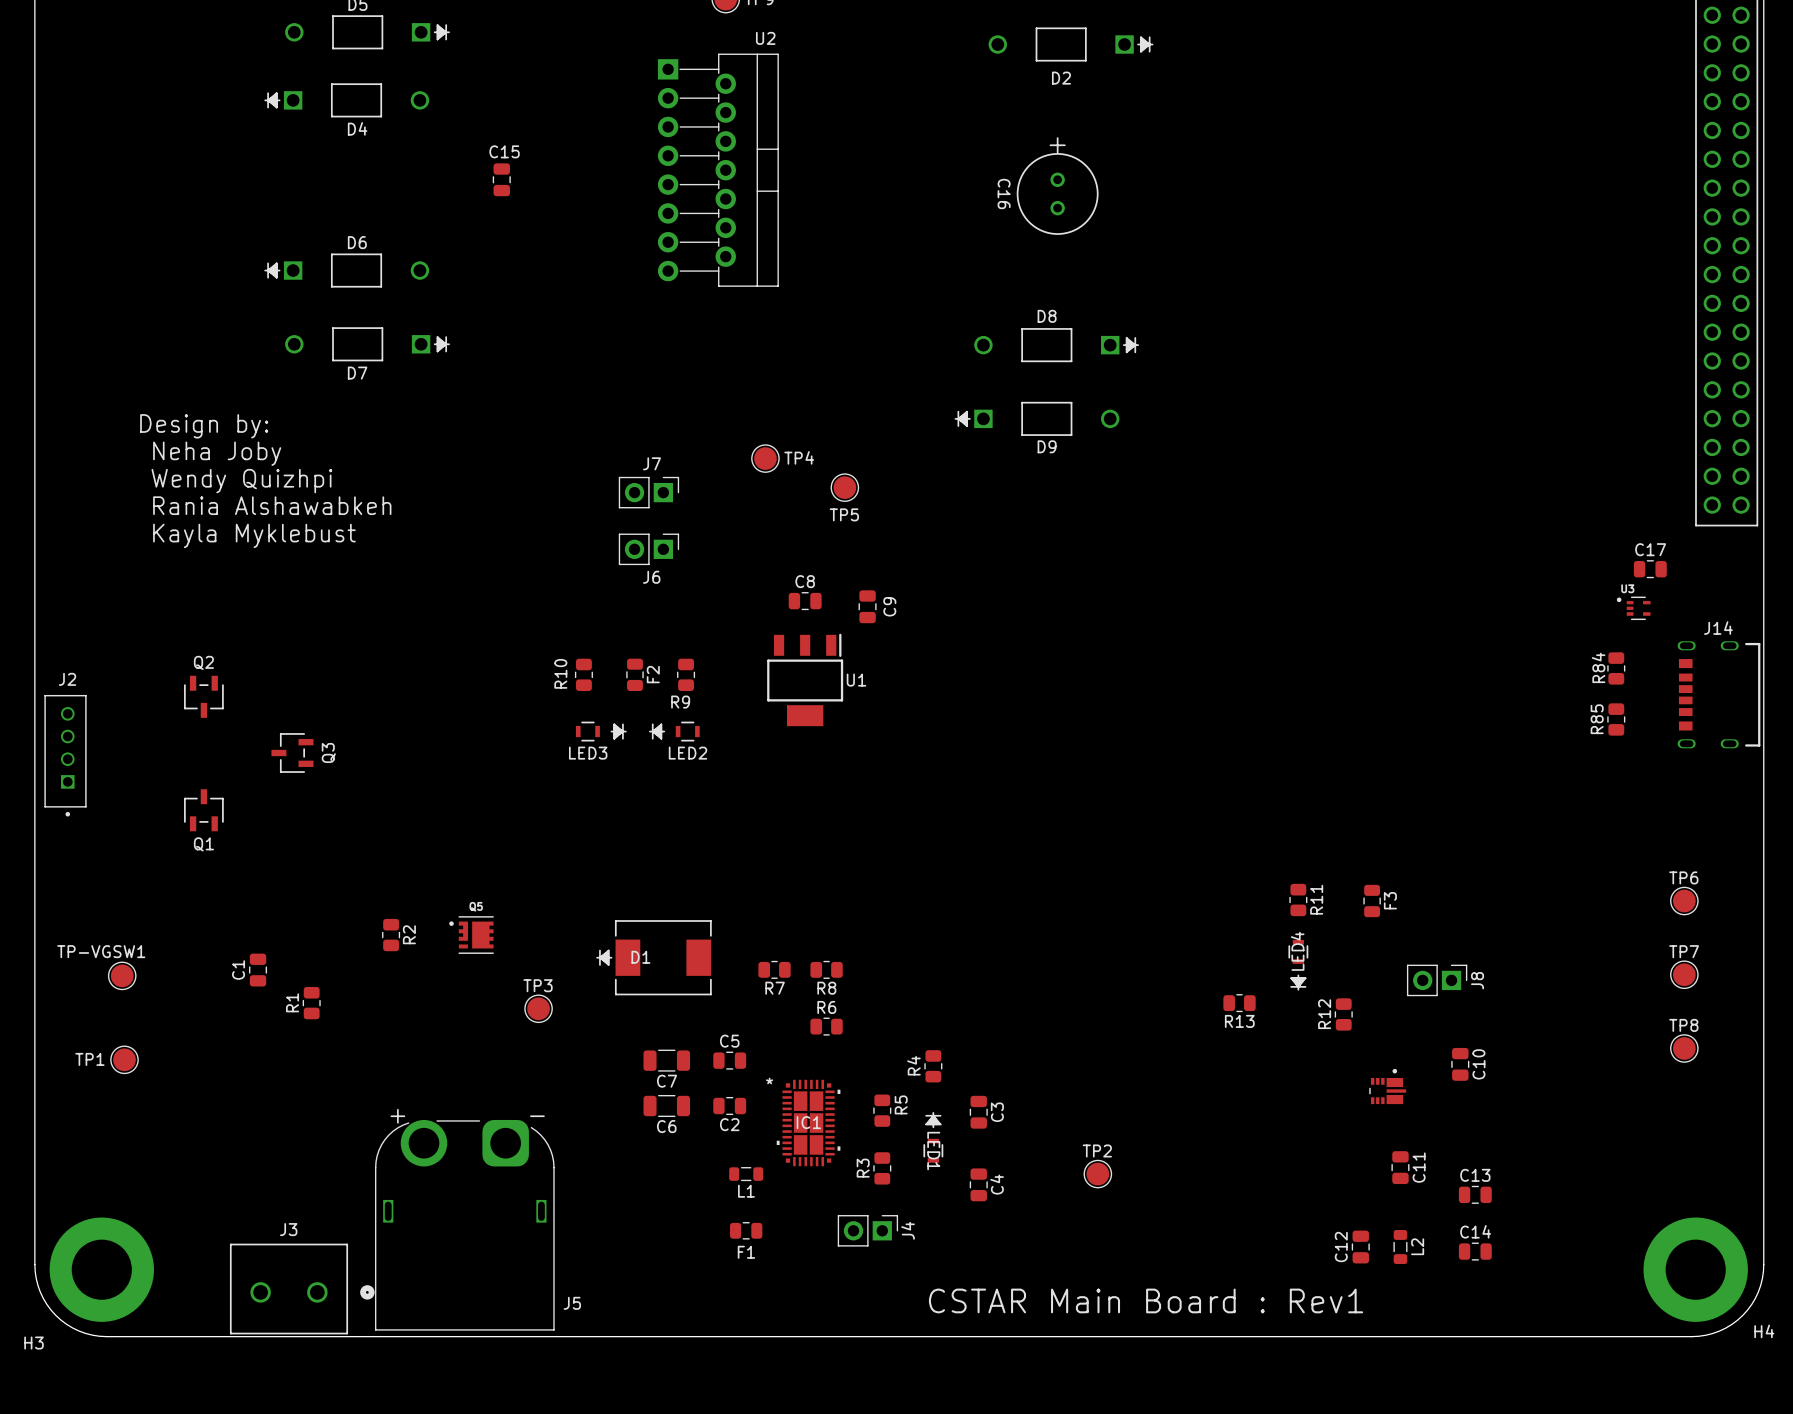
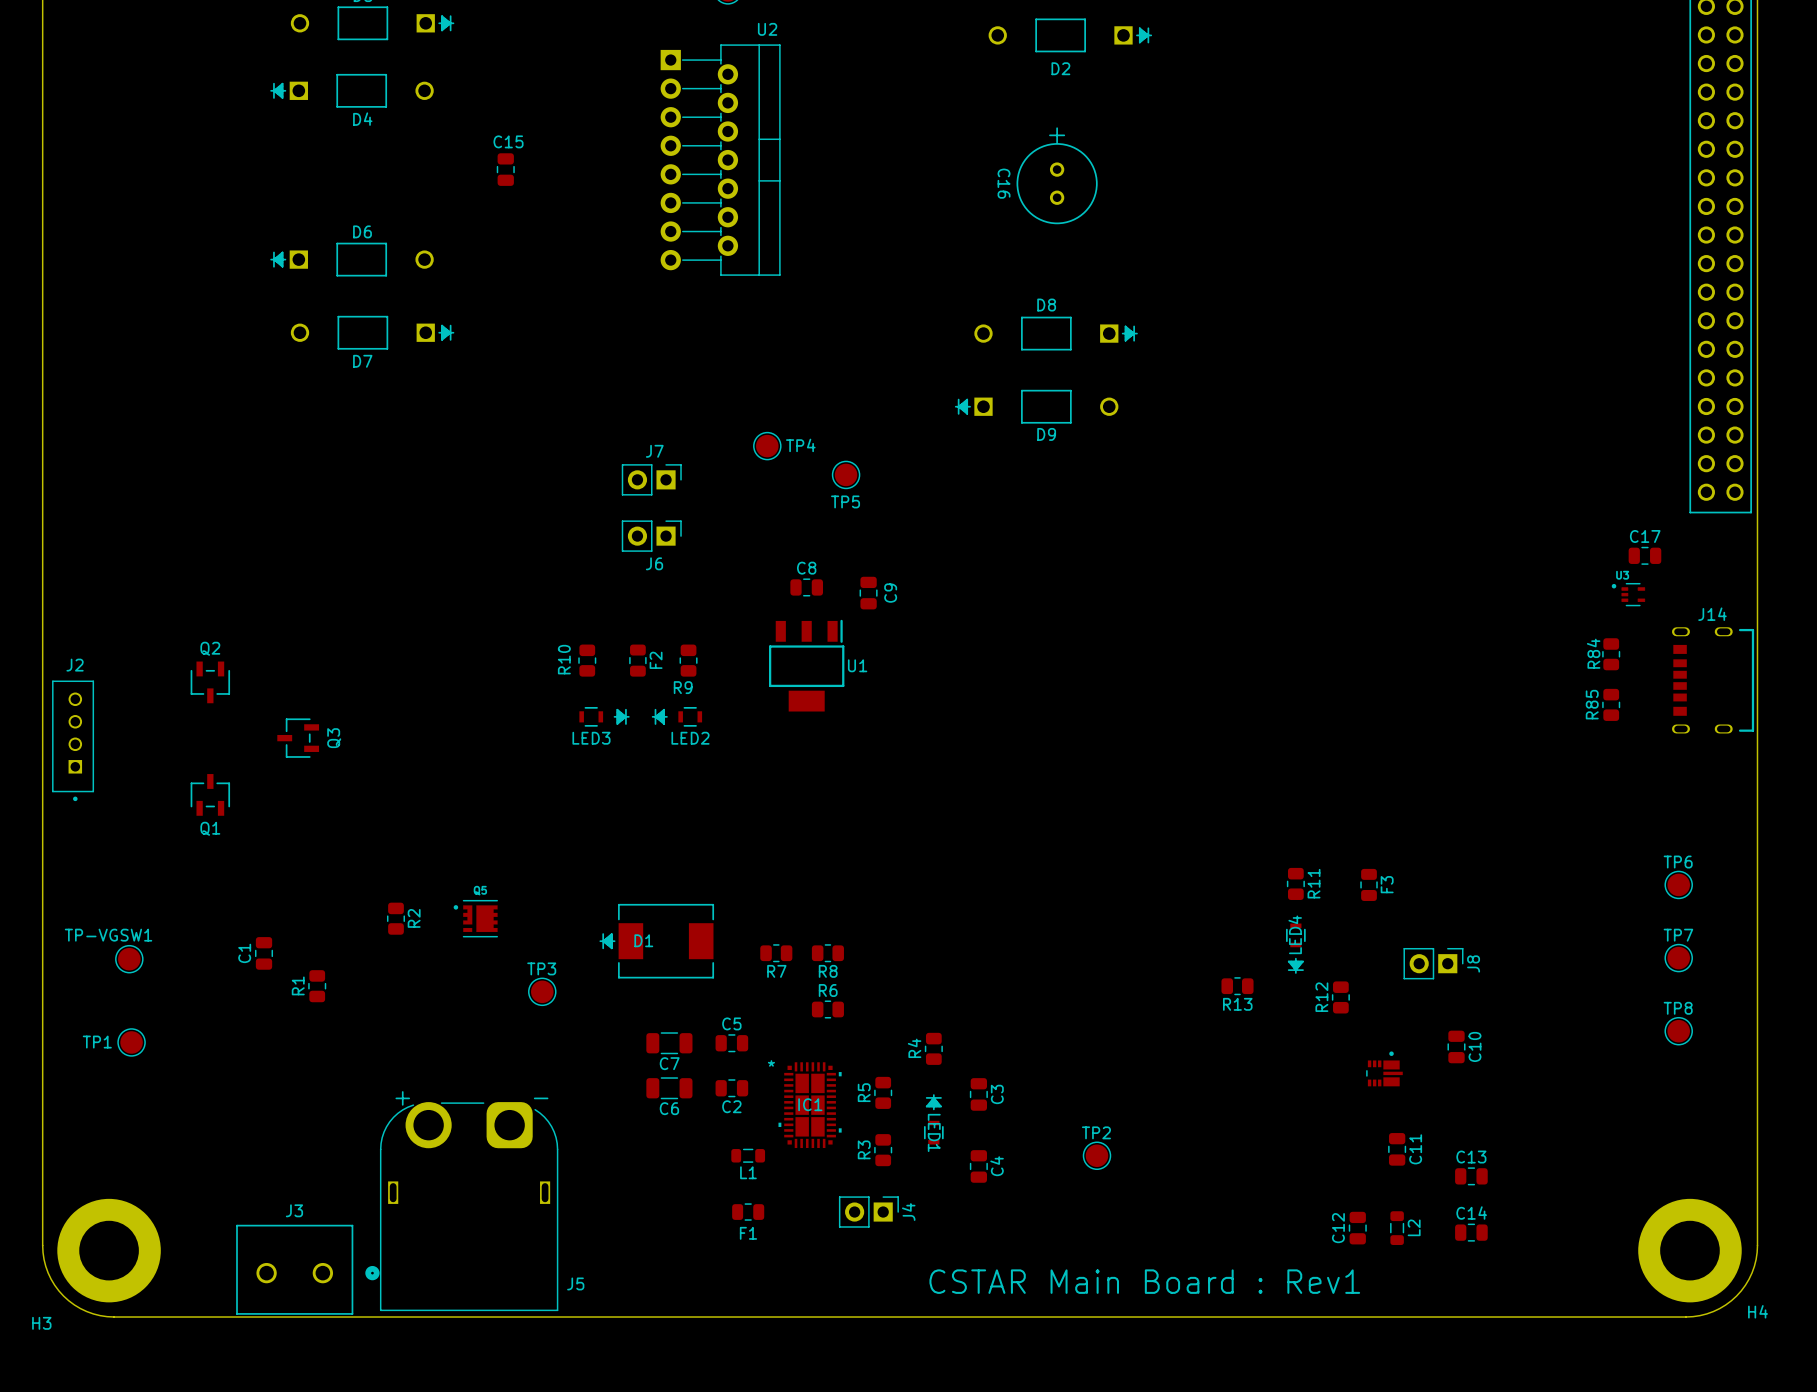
text: Design by: (204, 426) -> none
text: Neha Joby (217, 453) -> none
text: Wendy Quizhpi (241, 481) -> none
text: Rania Alshawabkeh (272, 505) -> none
text: Kayla Myklebust (254, 535) -> none
R5 name position: R5 (901, 1104) -> R5 (864, 1092)

